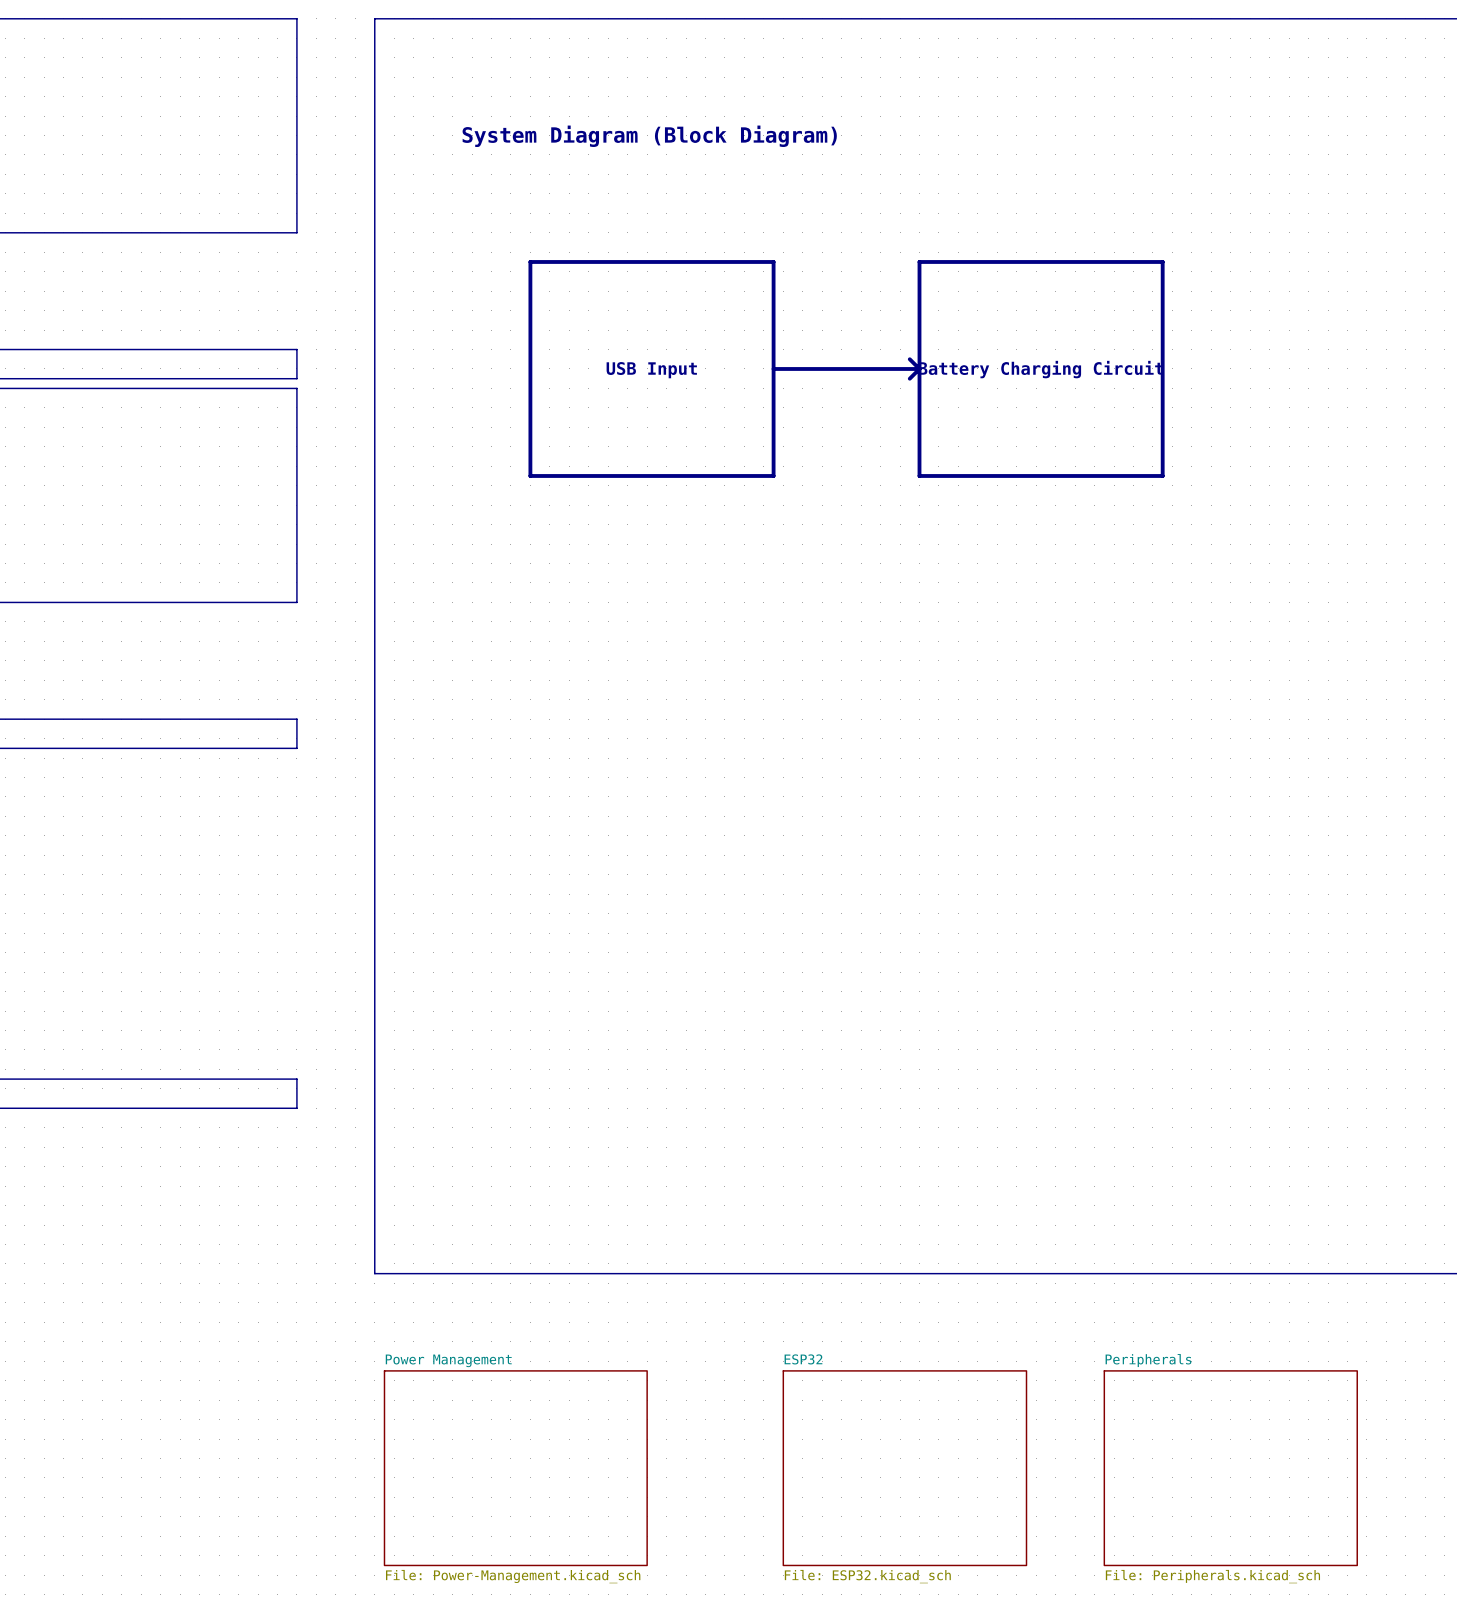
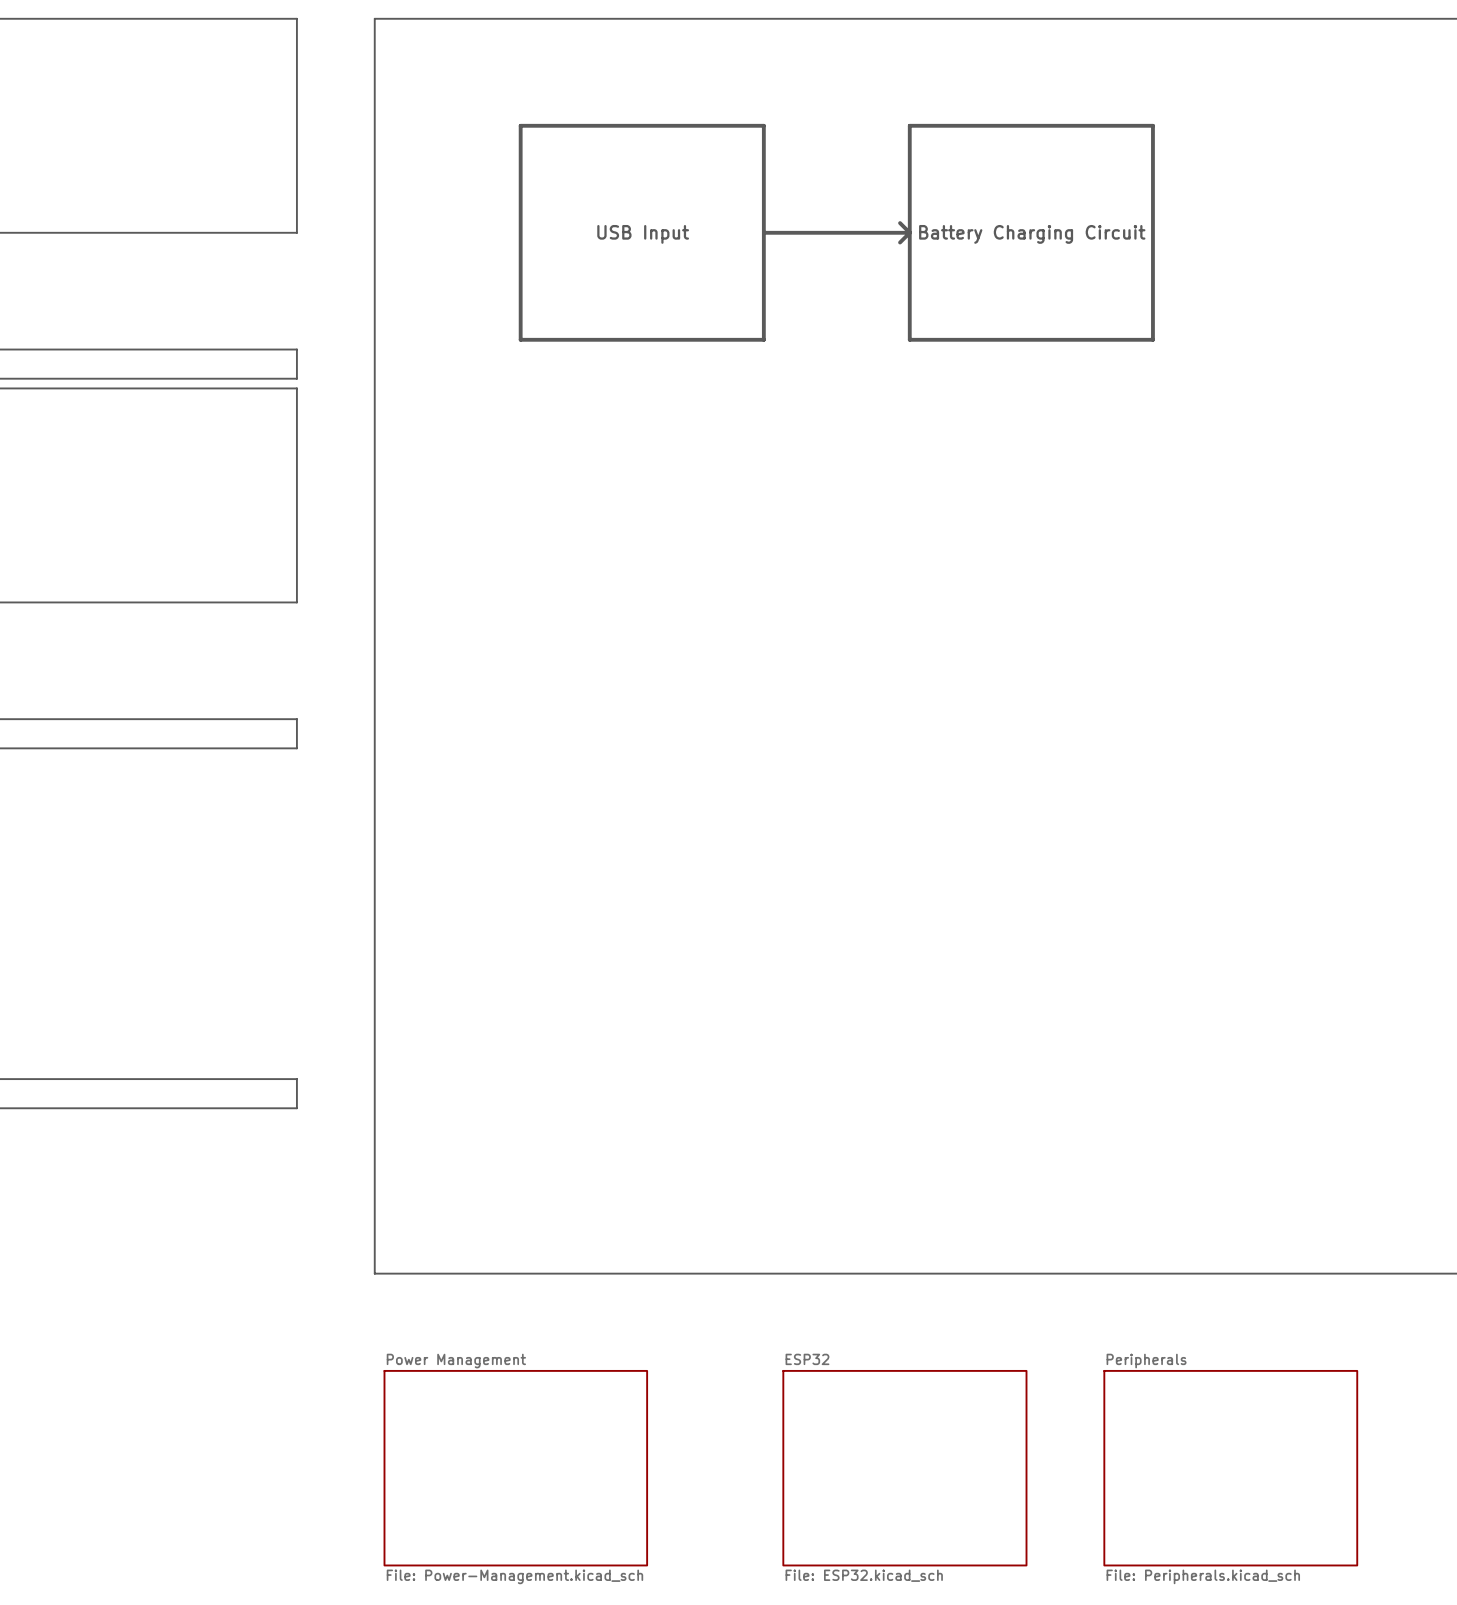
text: System Diagram (Block Diagram) (649, 136) -> none
line: (530, 261) (773, 261) (773, 475) (530, 475) (530, 261) -> (520, 125) (763, 125) (763, 339) (520, 339) (520, 125)
line: (919, 261) (1162, 261) (1162, 475) (919, 475) (919, 261) -> (909, 125) (1152, 125) (1152, 339) (909, 339) (909, 125)
line: (773, 368) (919, 368) -> (763, 232) (909, 232)
line: (919, 368) (909, 378) -> (909, 232) (900, 242)
line: (919, 368) (909, 359) (919, 368) -> (909, 232) (900, 223) (909, 232)
text position: Battery Charging Circuit (1040, 369) -> Battery Charging Circuit (1032, 234)
text position: USB Input (651, 370) -> USB Input (643, 234)

